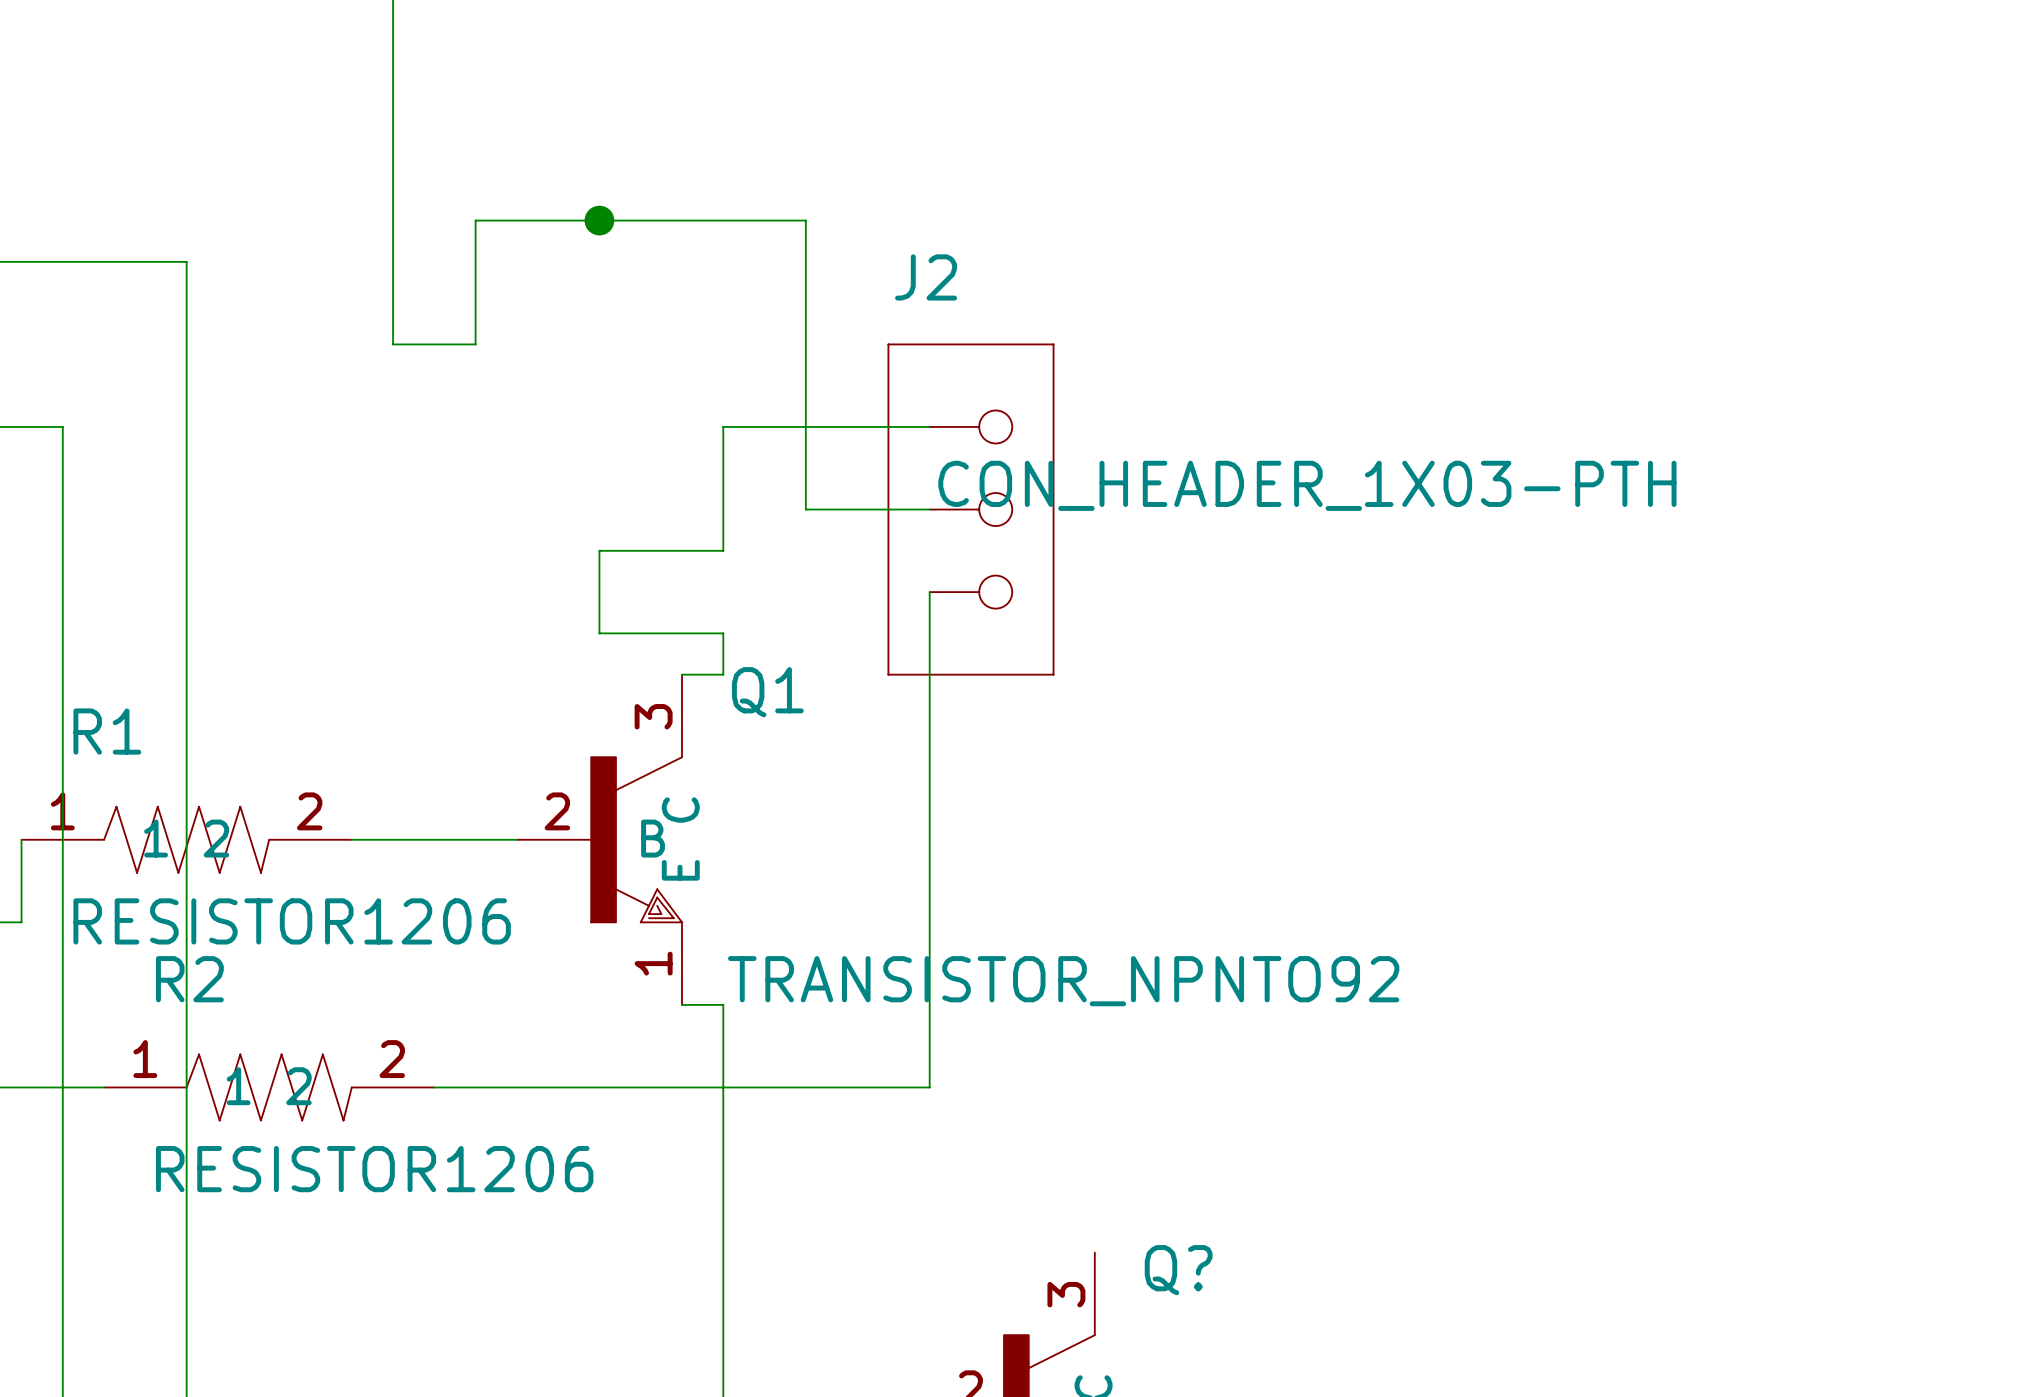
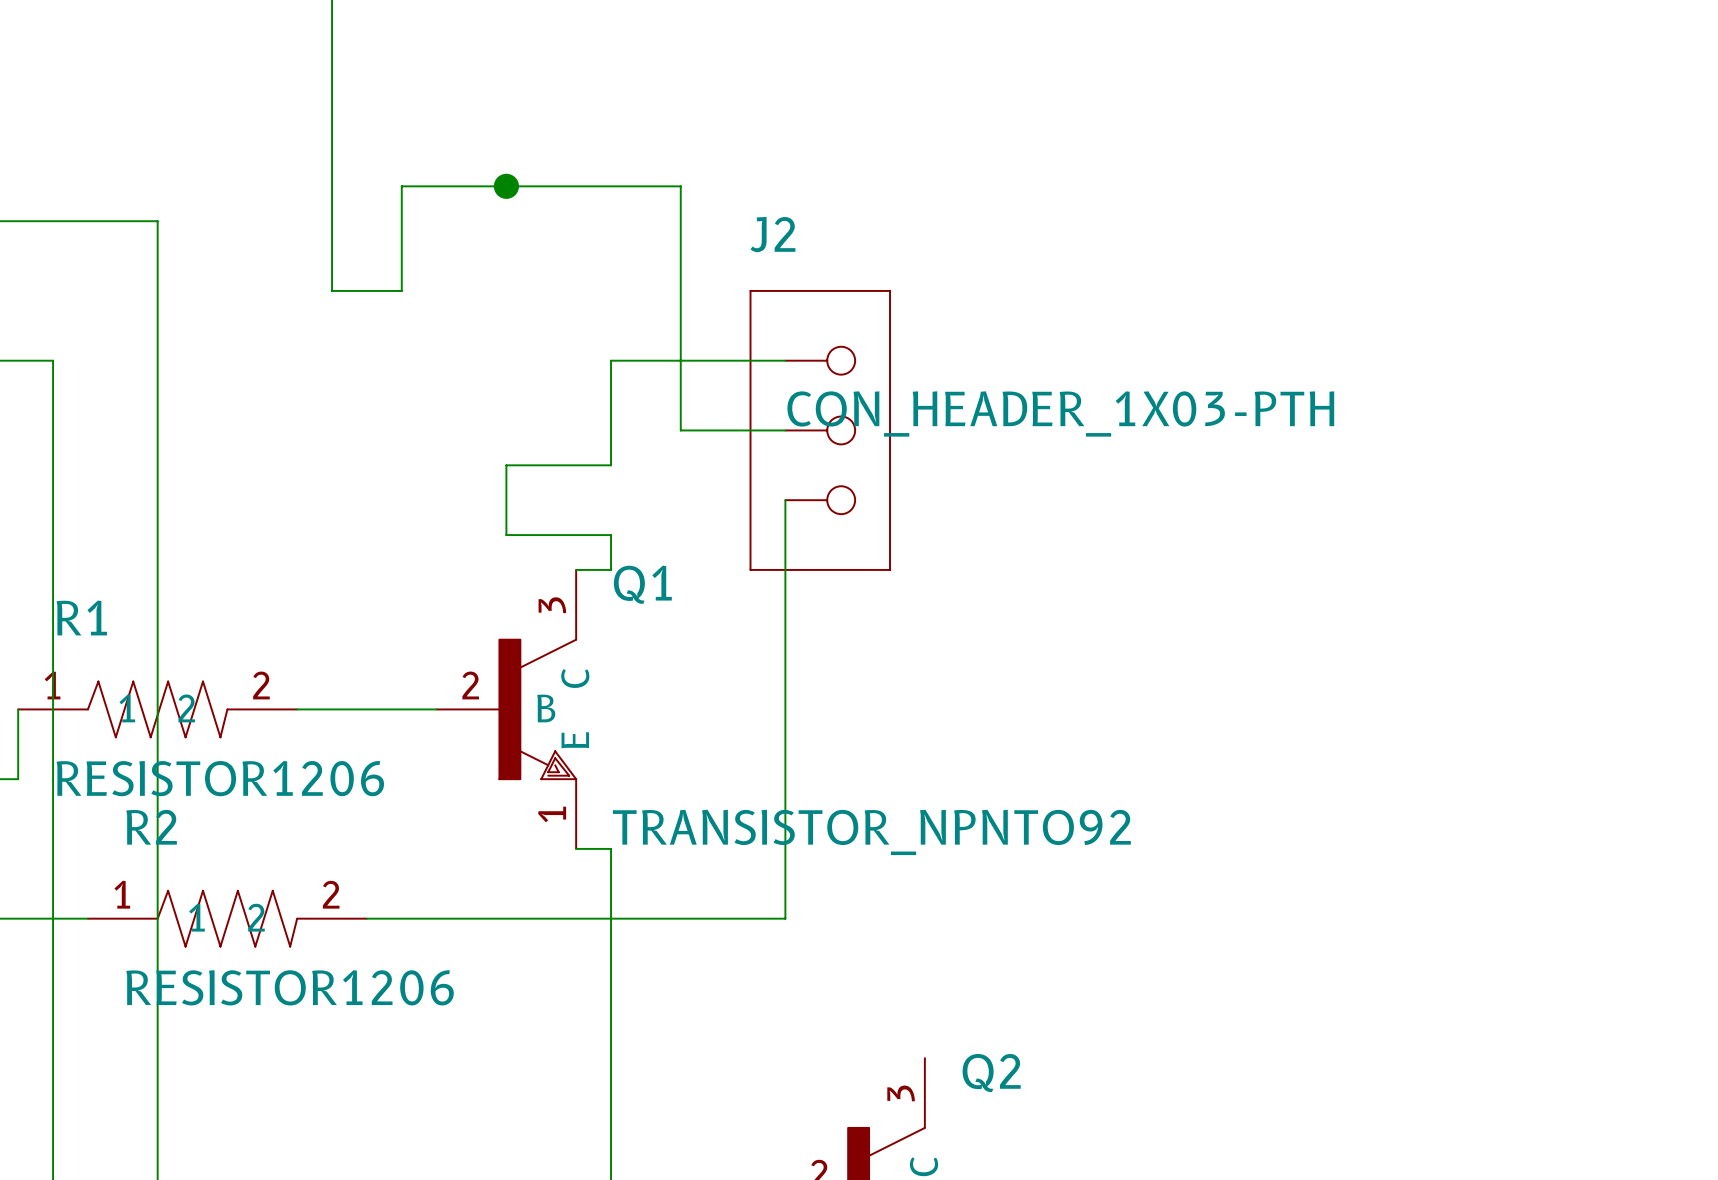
Q? name: Q? (1178, 1270) -> Q2 (991, 1073)

